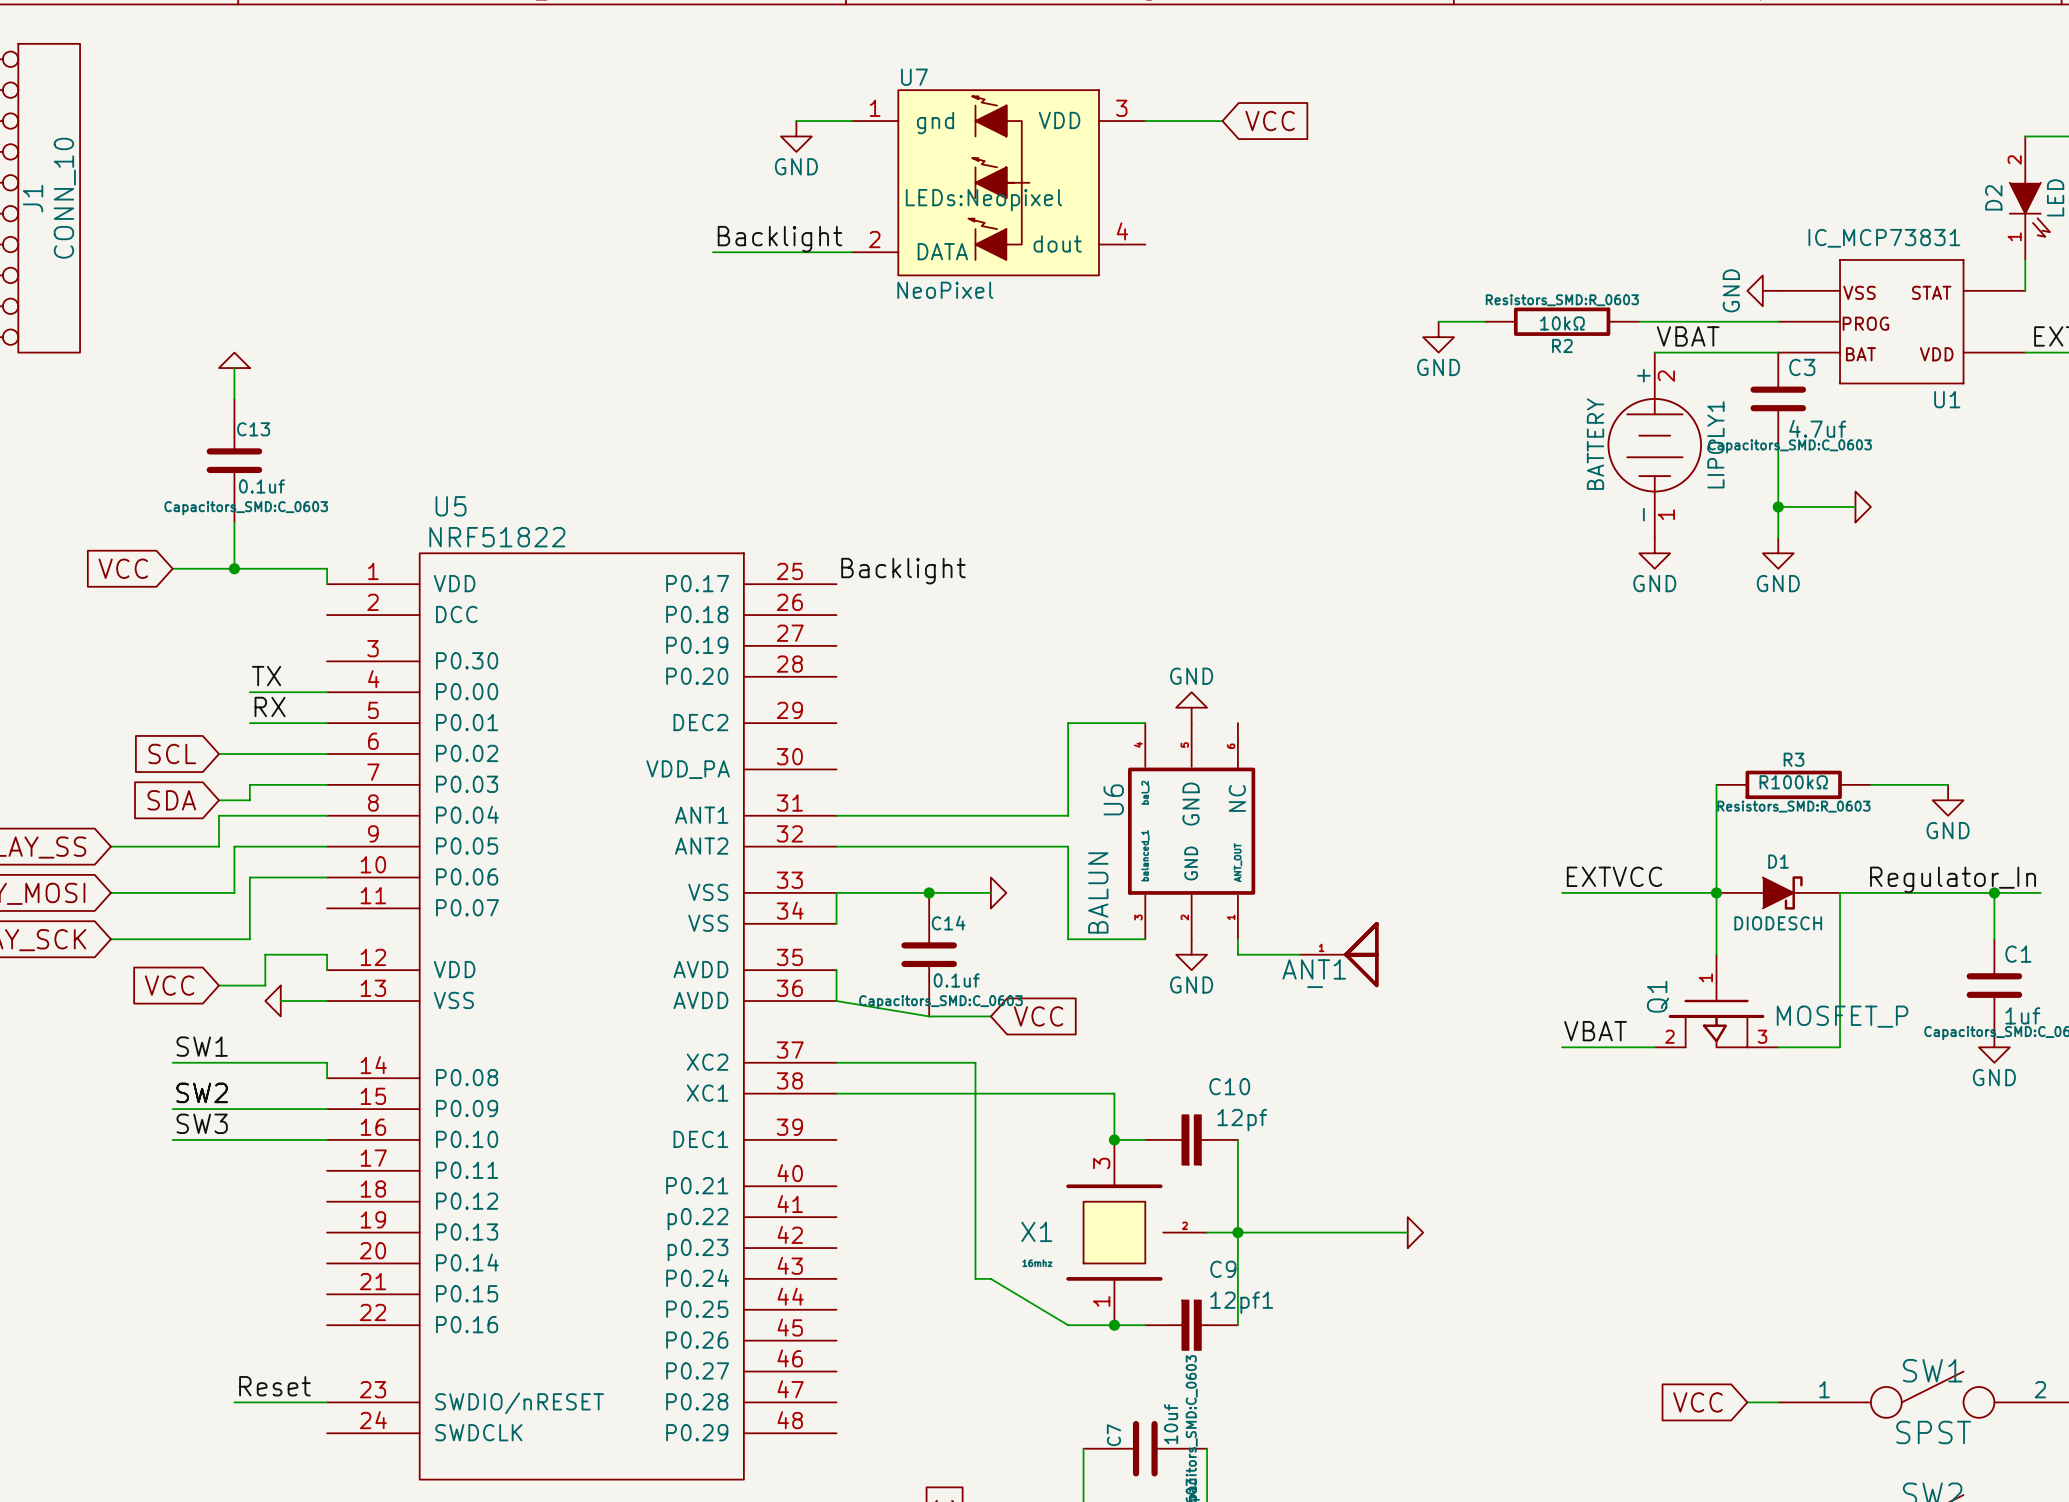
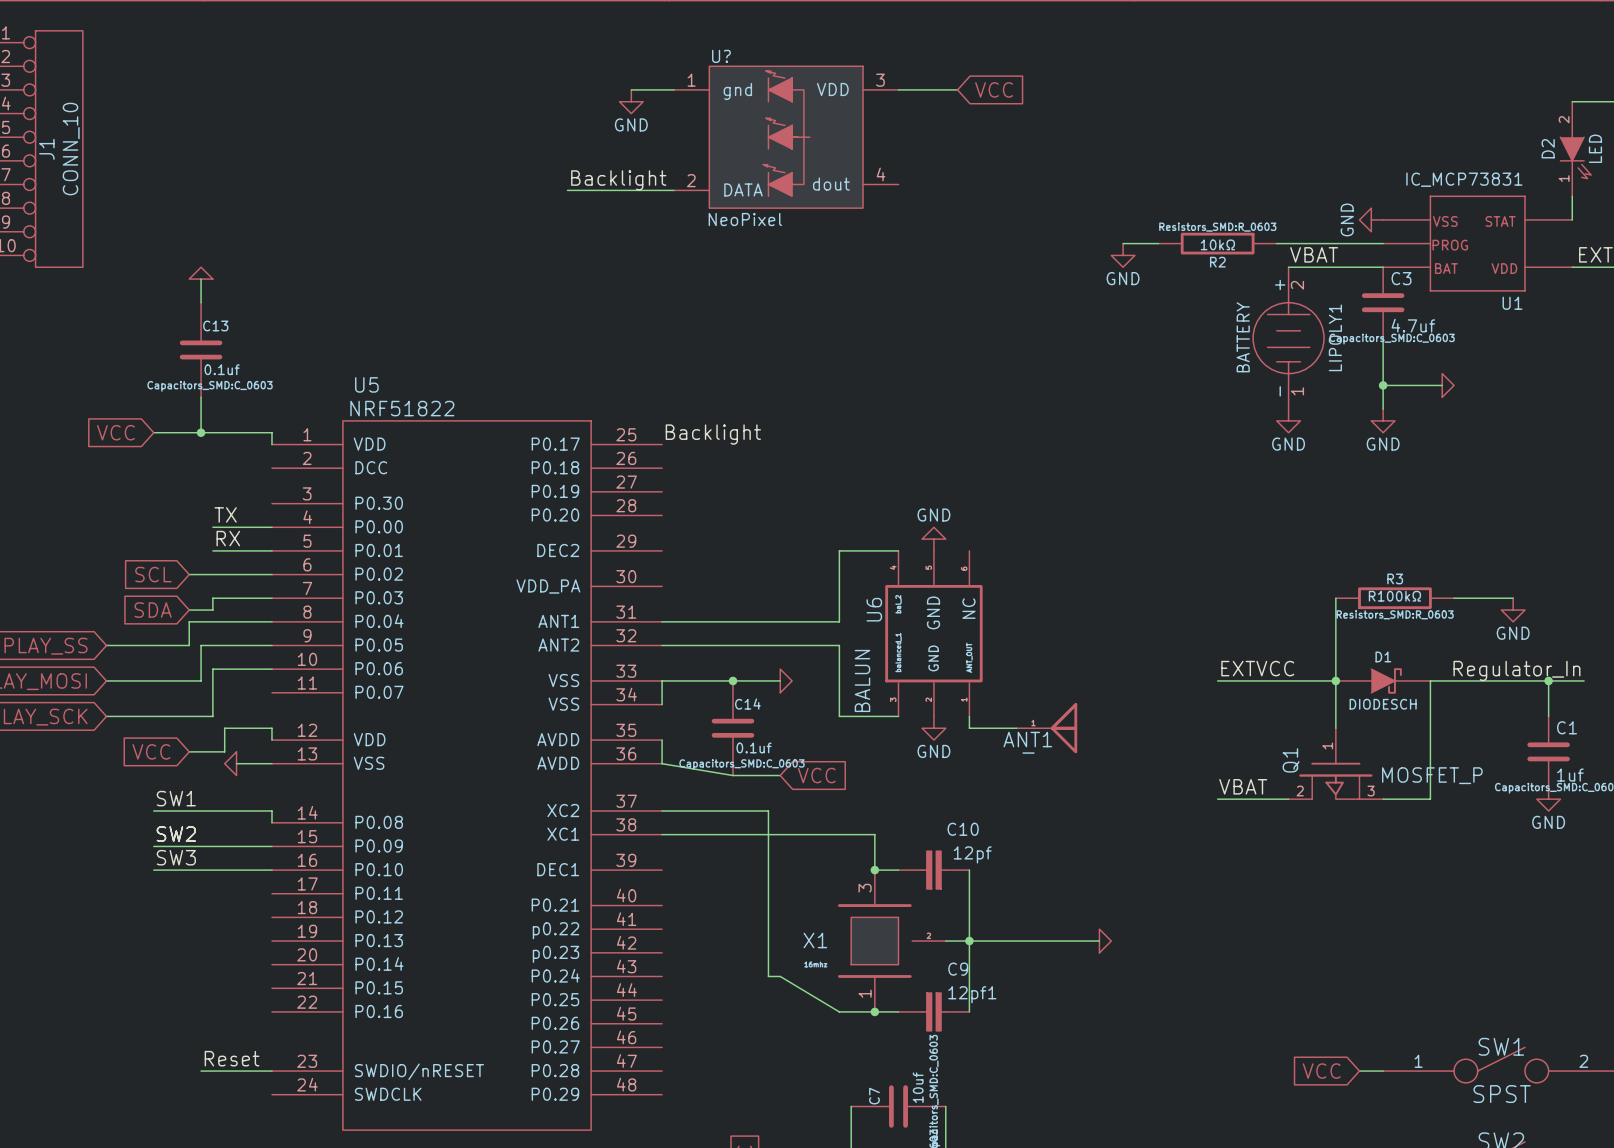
U7 name: U7 (914, 77) -> U? (721, 56)
U7 text: LEDs:Neopixel (983, 200) -> none

